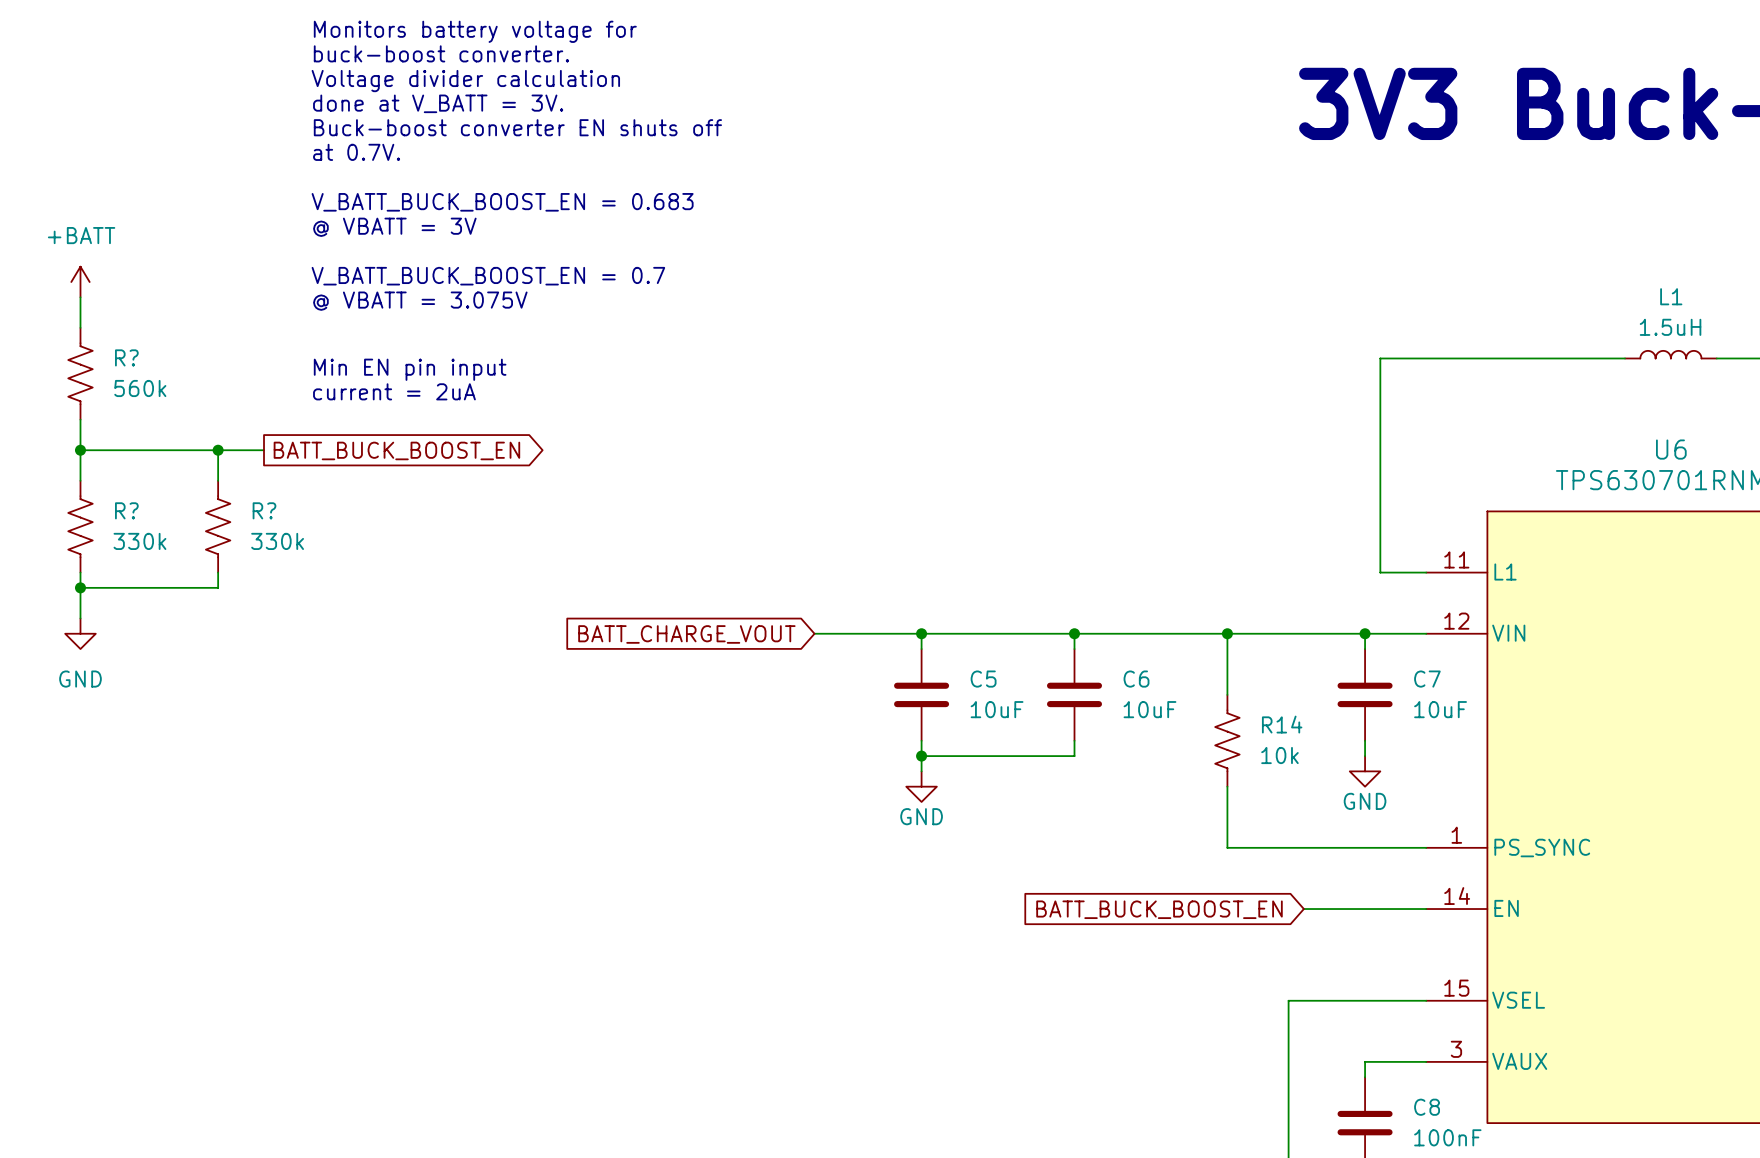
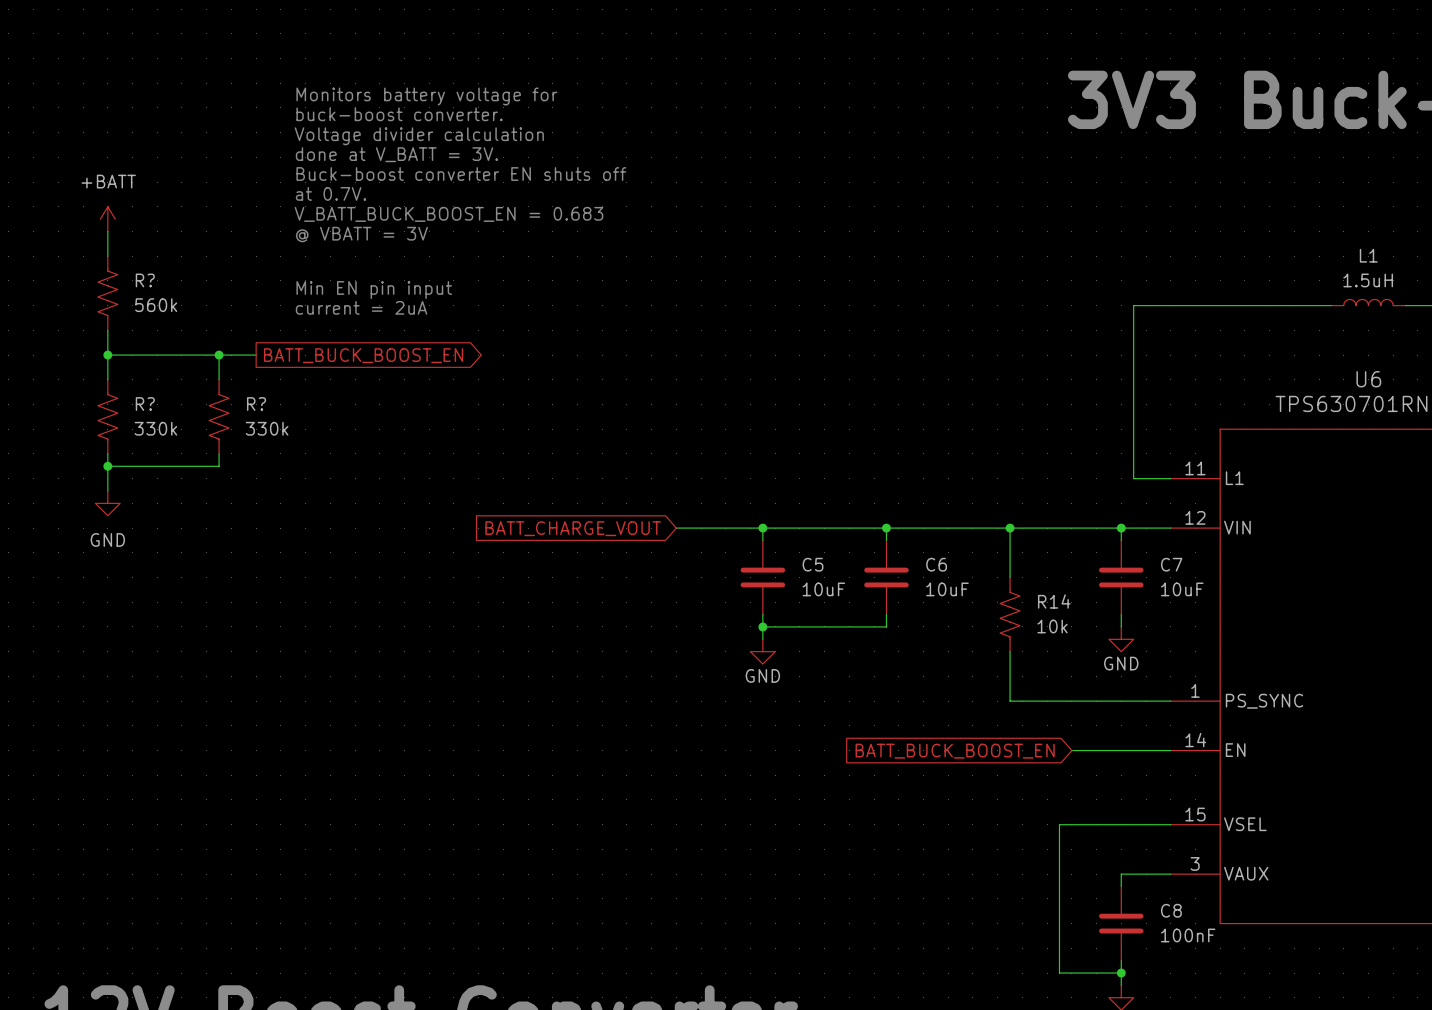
text position: Monitors battery voltage for (475, 31) -> Monitors battery voltage for (426, 96)
text position: buck-boost converter. (441, 53) -> buck-boost converter. (399, 114)
text position: Voltage divider calculation (465, 81) -> Voltage divider calculation (419, 136)
text position: done at V_BATT = 3V. (438, 103) -> done at V_BATT = 3V. (396, 154)
text position: Buck-boost converter EN shuts off (517, 127) -> Buck-boost converter EN shuts off (461, 174)
text position: at 0.7V. (356, 152) -> at 0.7V. (330, 193)
text position: V_BATT_BUCK_BOOST_EN = 0.683 (502, 202) -> V_BATT_BUCK_BOOST_EN = 0.683 (448, 214)
text position: @ VBATT = 3V (394, 227) -> @ VBATT = 3V (361, 234)
text: V_BATT_BUCK_BOOST_EN = 0.7 (488, 276) -> none
power symbol position: +BATT (80, 282) -> +BATT (107, 219)
wire: (80, 297) (80, 327) -> (107, 231) (107, 256)
text: @ VBATT = 3.075V (420, 301) -> none
text position: Min EN pin input (410, 369) -> Min EN pin input (374, 290)
R? position: (80, 373) -> (107, 293)
text position: current = 2uA (394, 391) -> current = 2uA (361, 307)
wire: (80, 419) (80, 480) -> (107, 330) (107, 379)
wire: (80, 450) (264, 450) -> (107, 355) (256, 355)
junction position: (80, 450) -> (107, 355)
wire: (218, 450) (218, 480) -> (219, 355) (219, 379)
junction position: (218, 450) -> (219, 355)
global label position: BATT_BUCK_BOOST_EN (396, 450) -> BATT_BUCK_BOOST_EN (363, 355)
R? position: (80, 526) -> (107, 416)
R? position: (218, 526) -> (219, 416)
wire: (80, 572) (80, 618) -> (107, 453) (107, 491)
wire: (218, 572) (218, 587) (80, 587) -> (219, 453) (219, 466) (107, 466)
junction position: (80, 587) -> (107, 466)
power symbol position: GND (80, 633) -> GND (107, 503)

